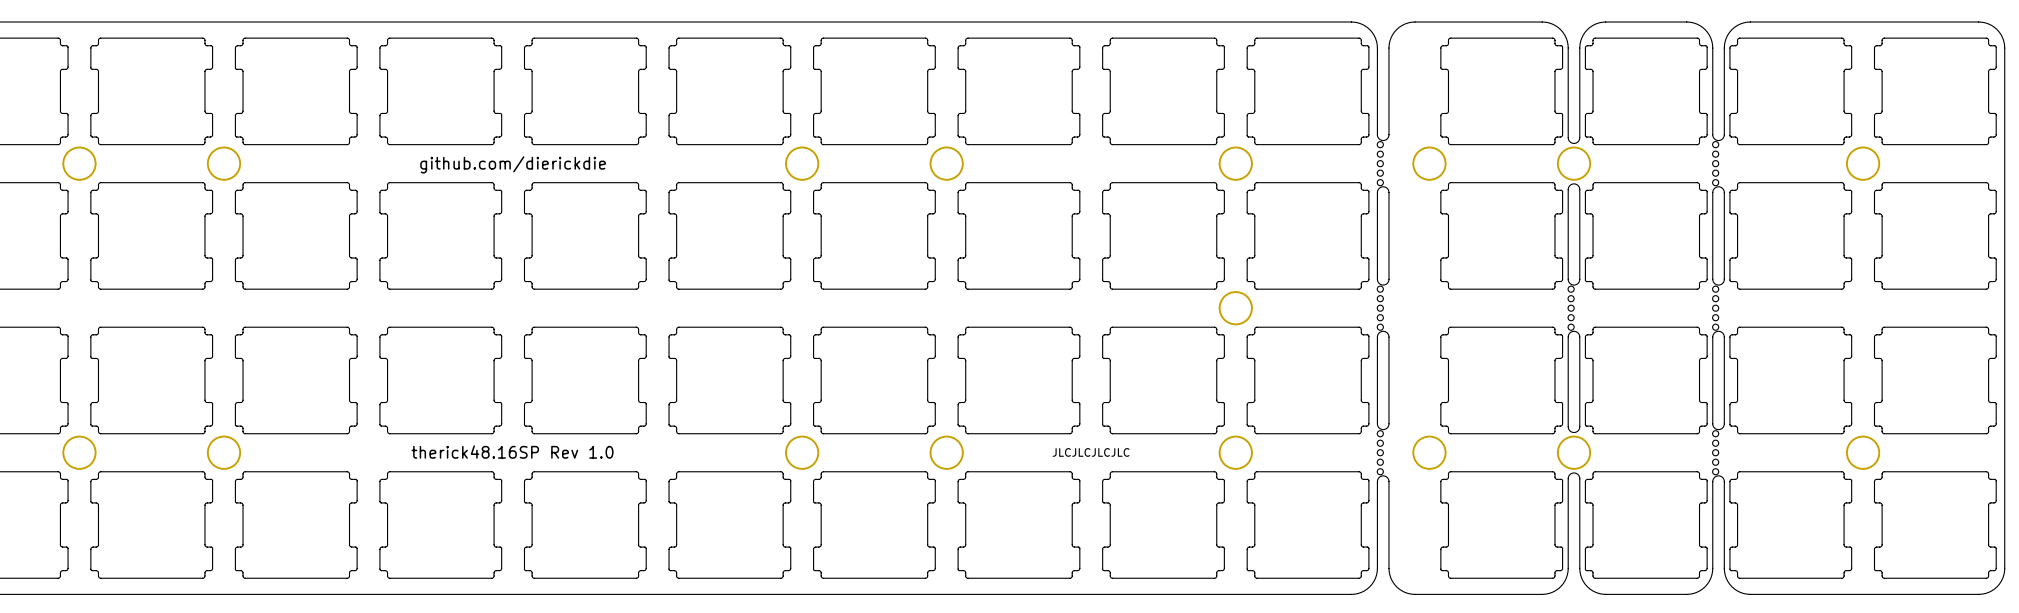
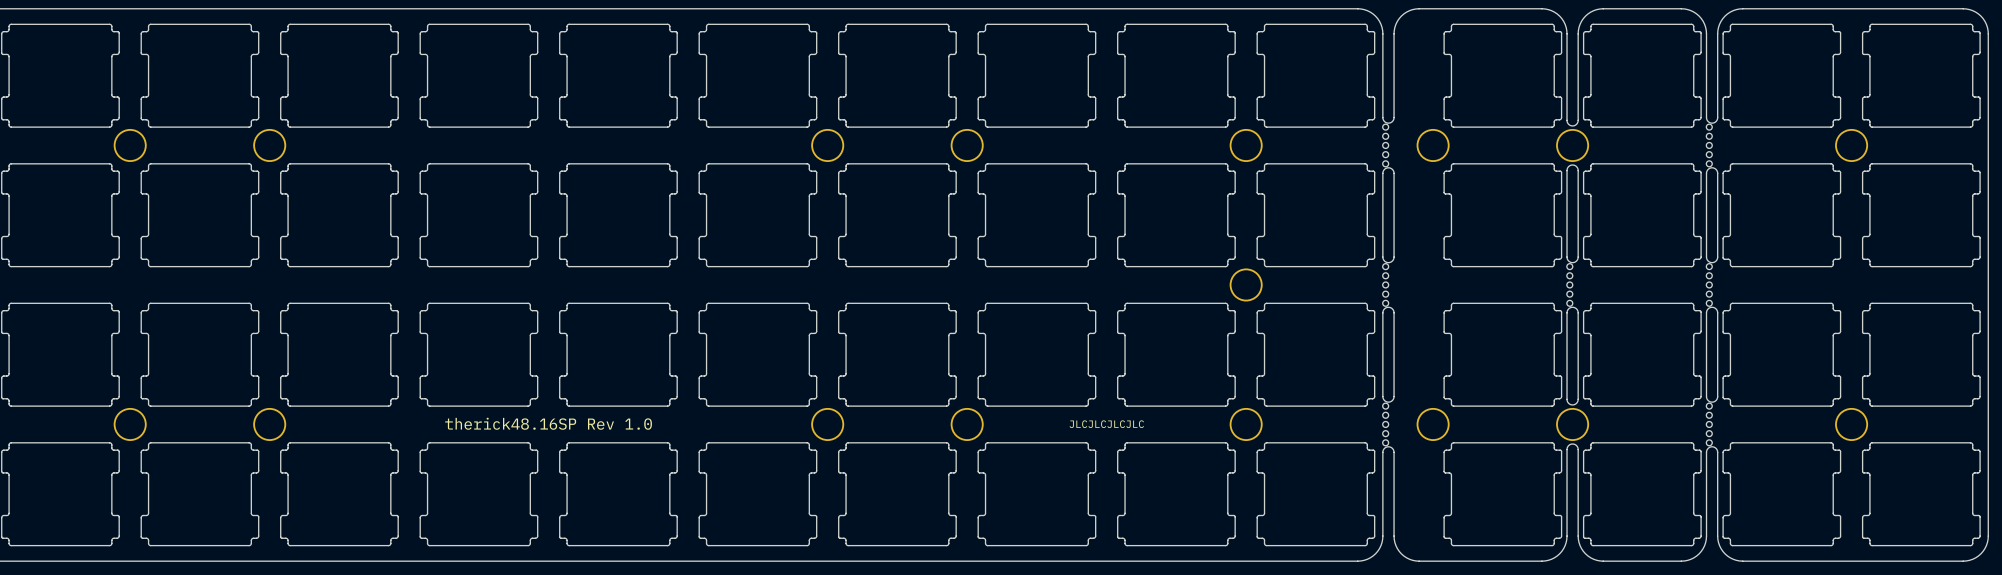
text: github.com/dierickdie (513, 164) -> none

